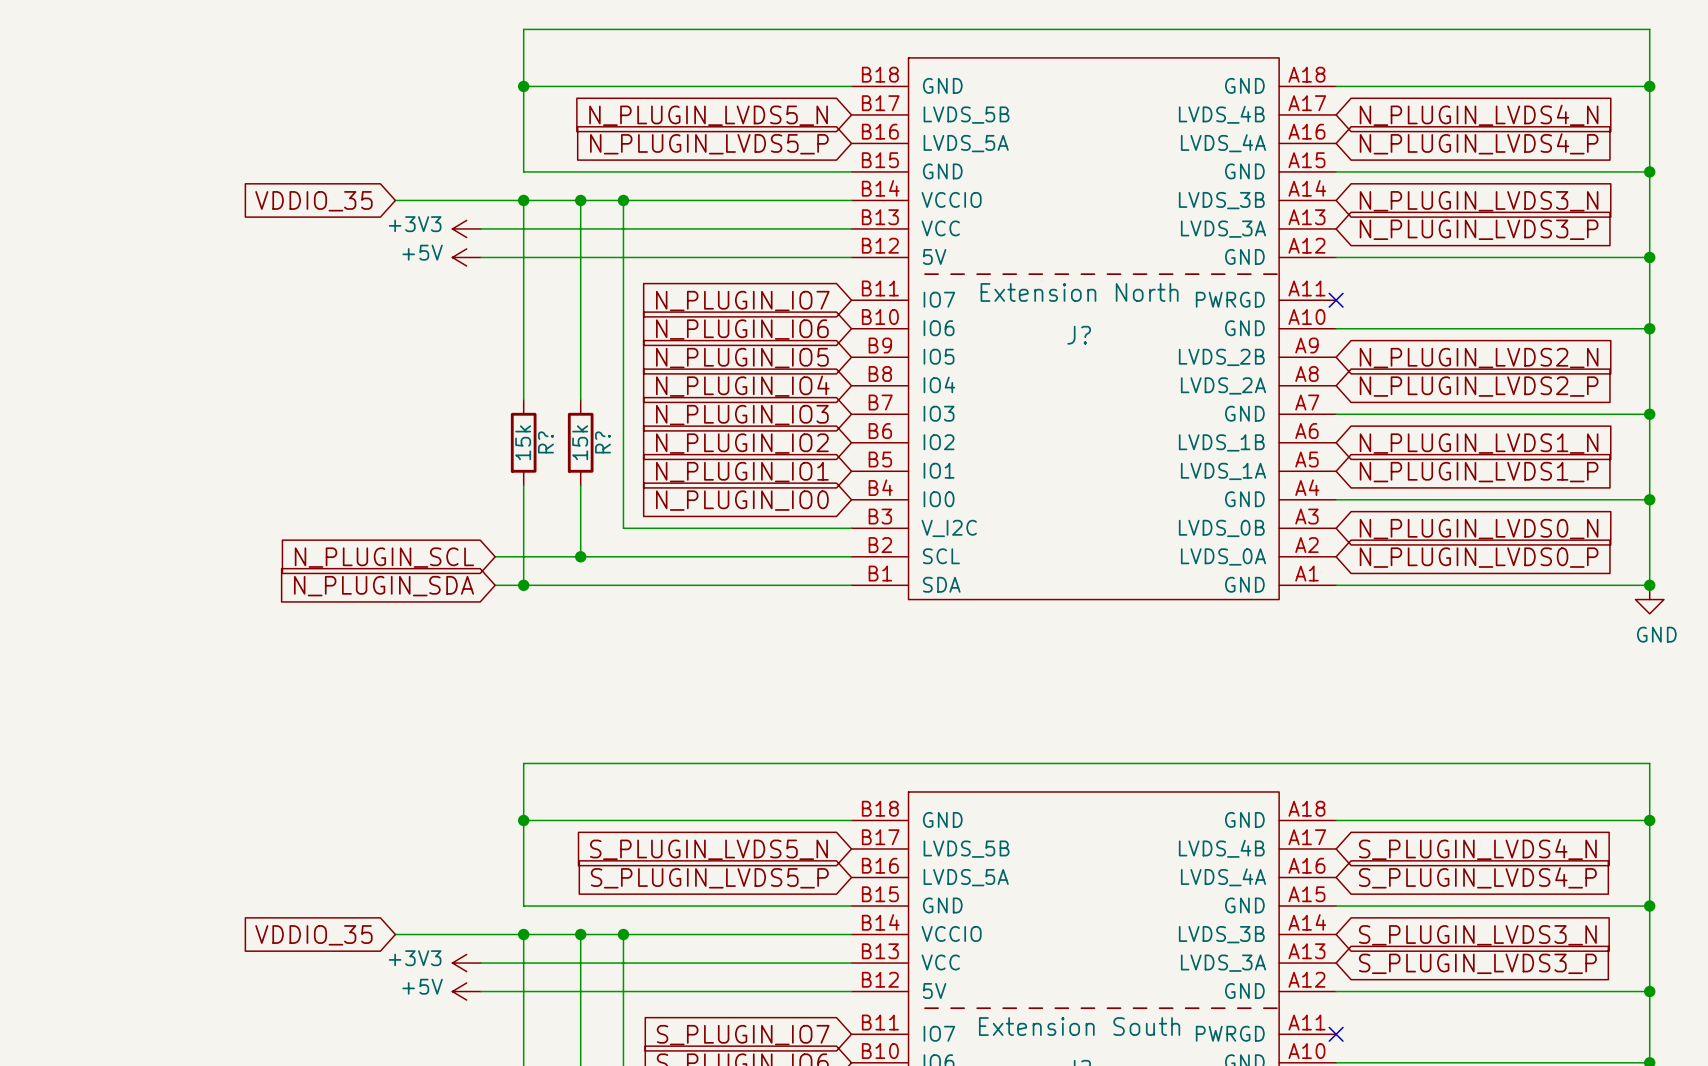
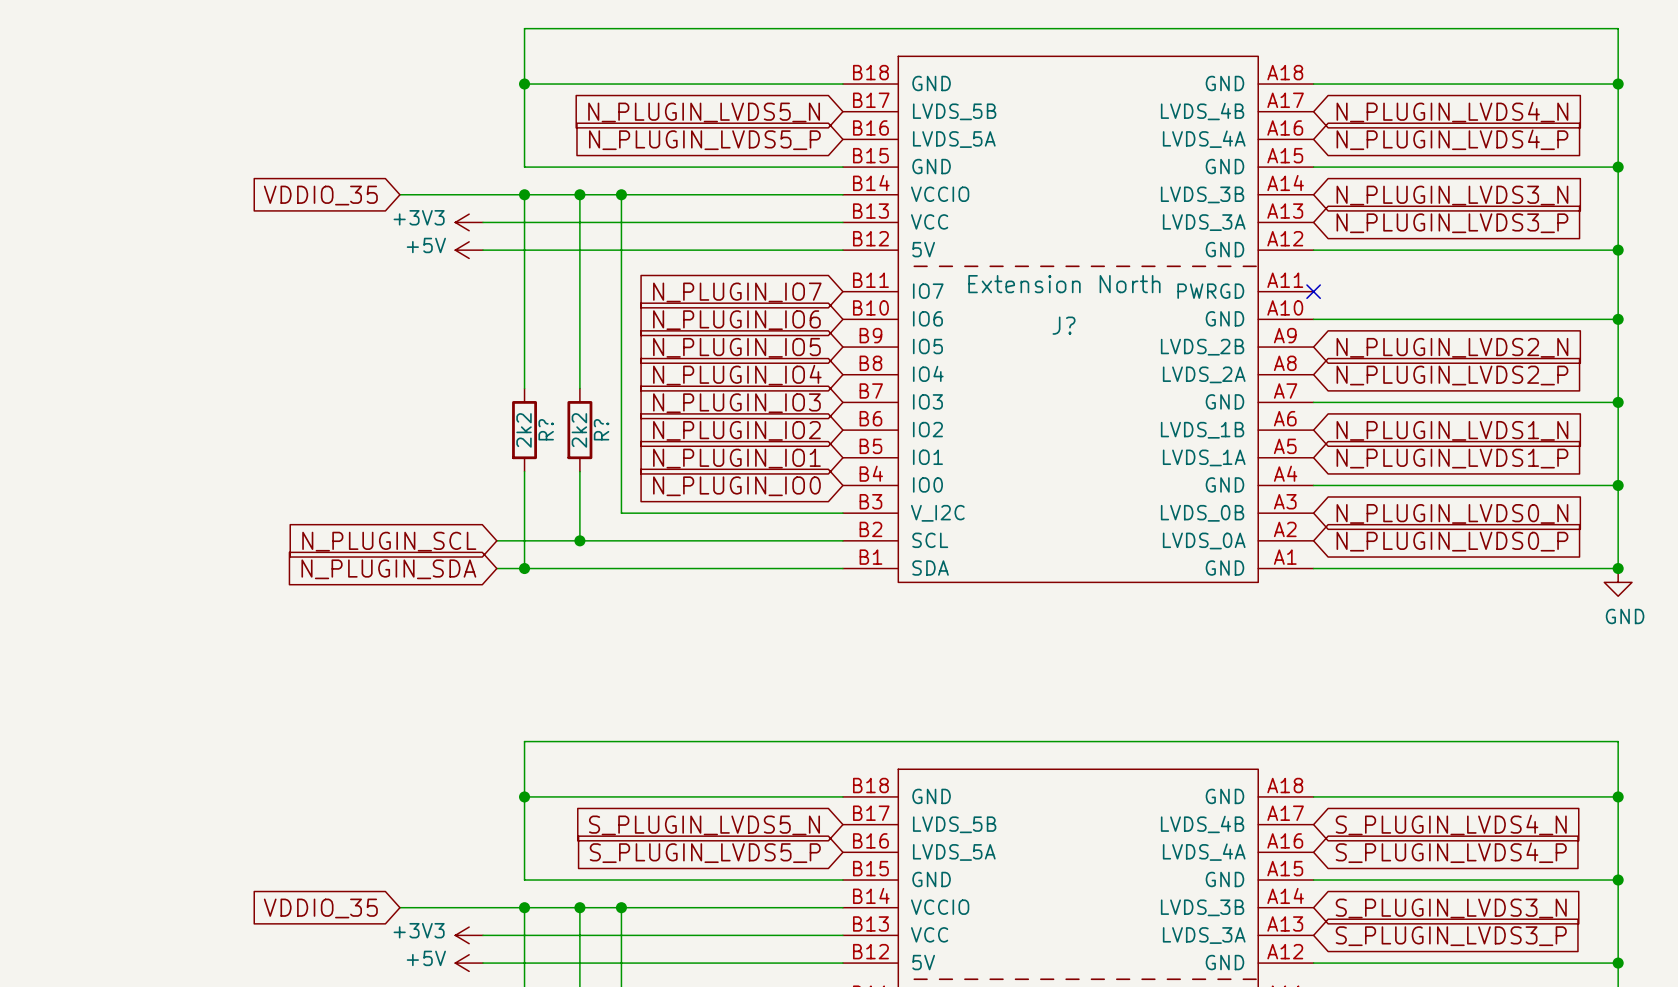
R? value: 15k (523, 442) -> 2k2 (524, 430)
R? value: 15k (580, 442) -> 2k2 (579, 430)

